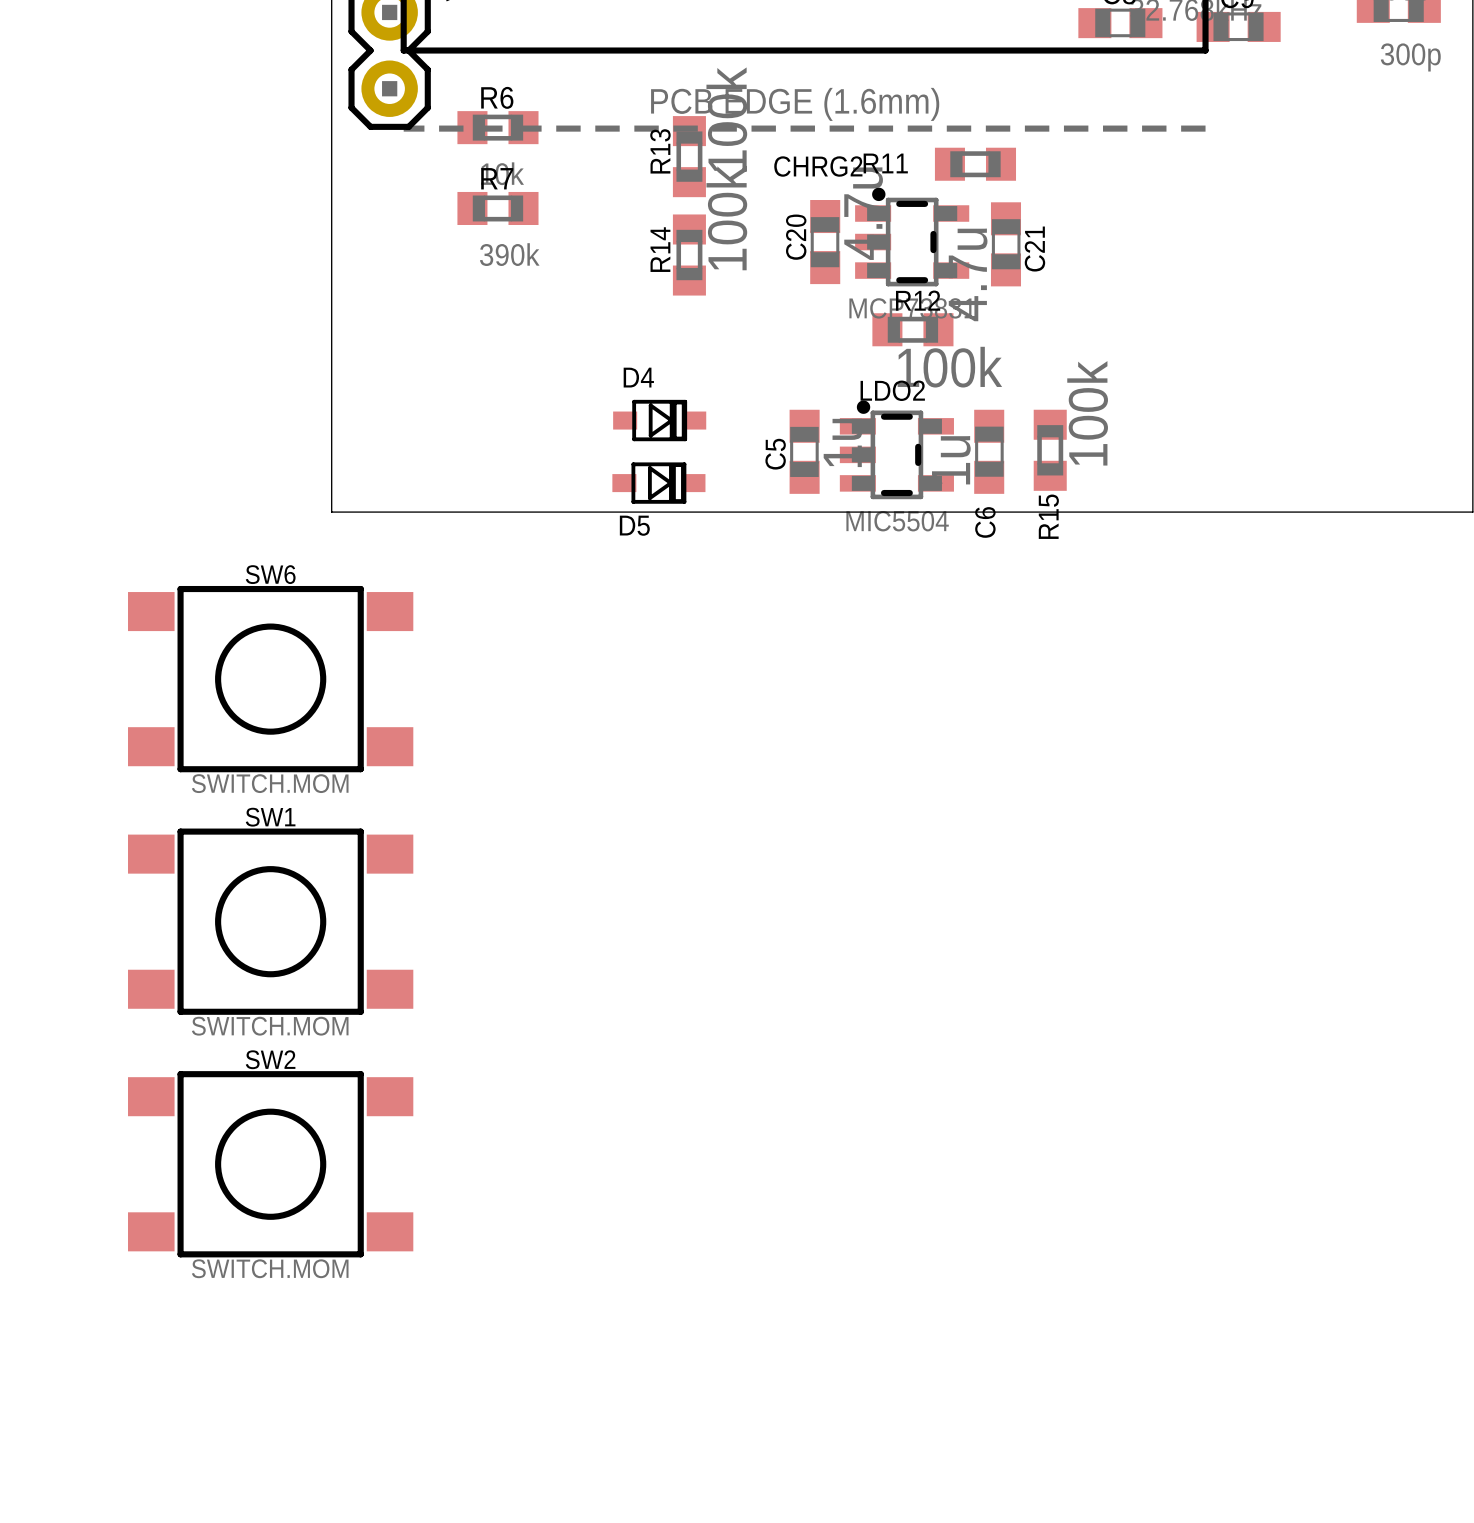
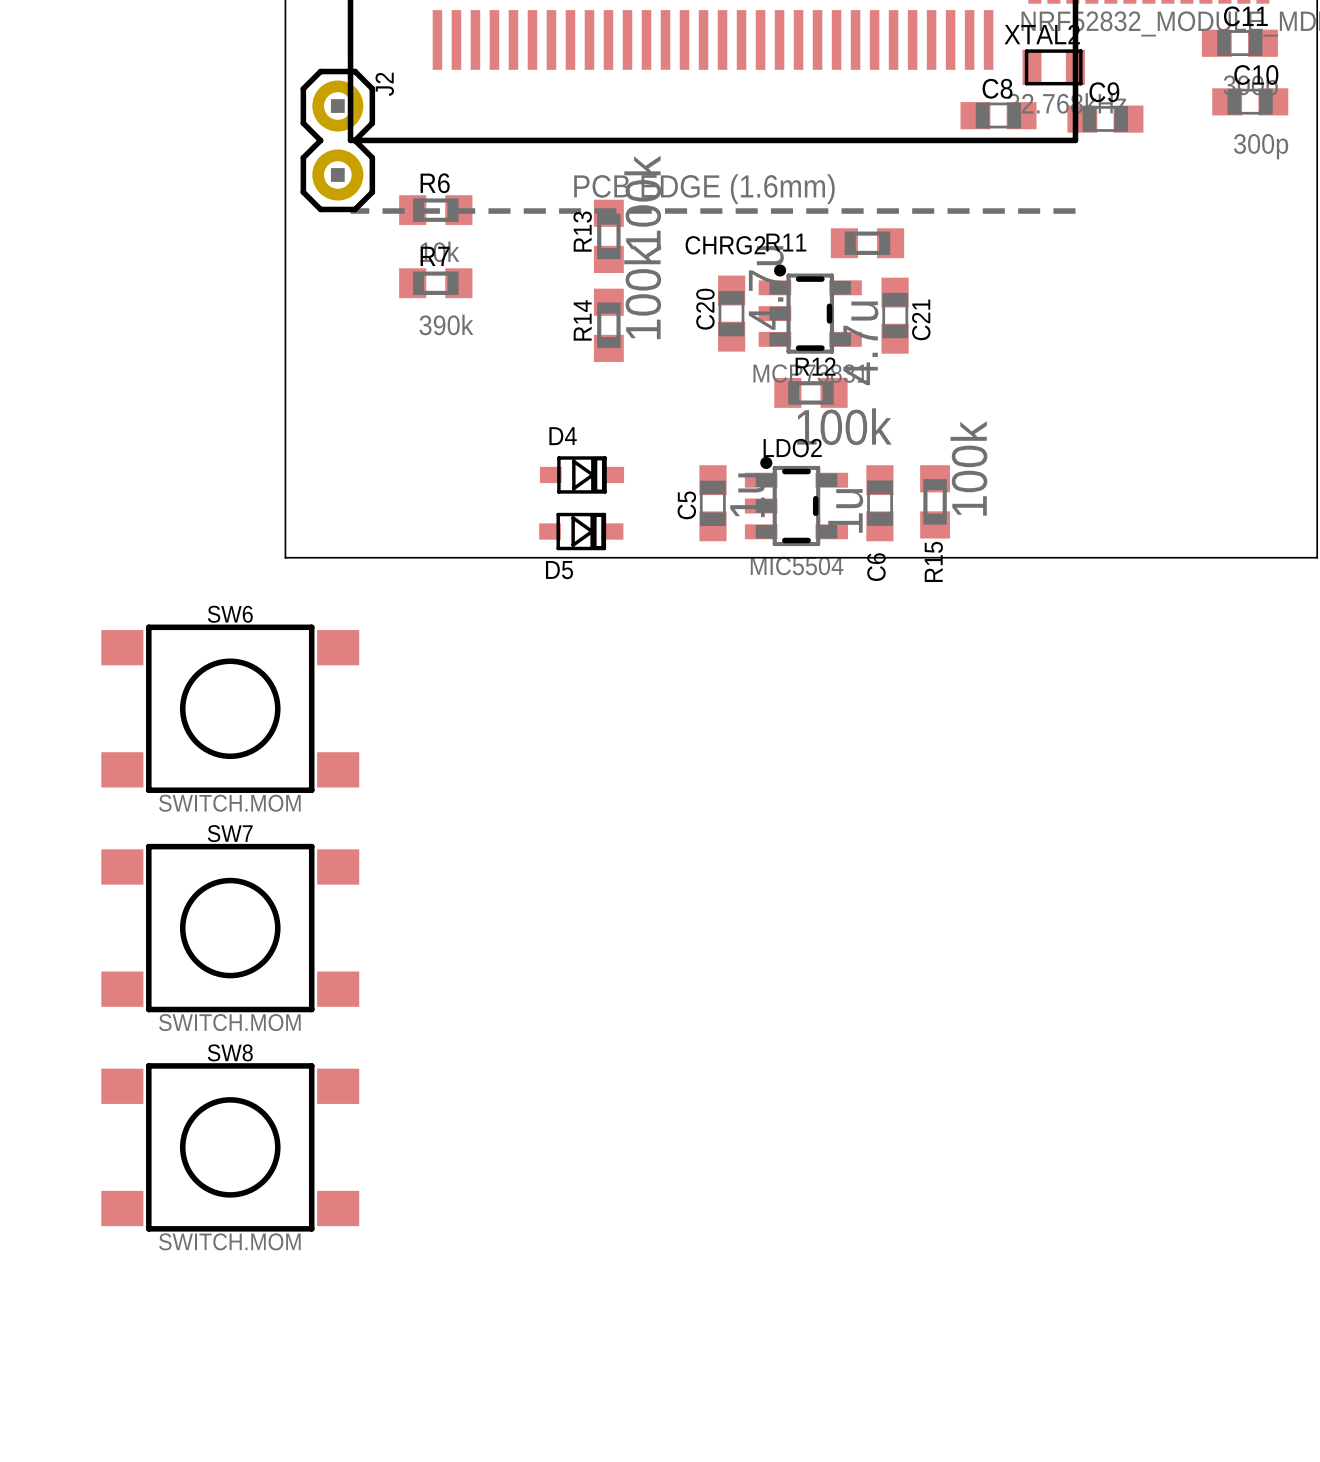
SW1 name: SW1 (270, 817) -> SW7 (230, 833)
SW2 name: SW2 (270, 1059) -> SW8 (230, 1052)

